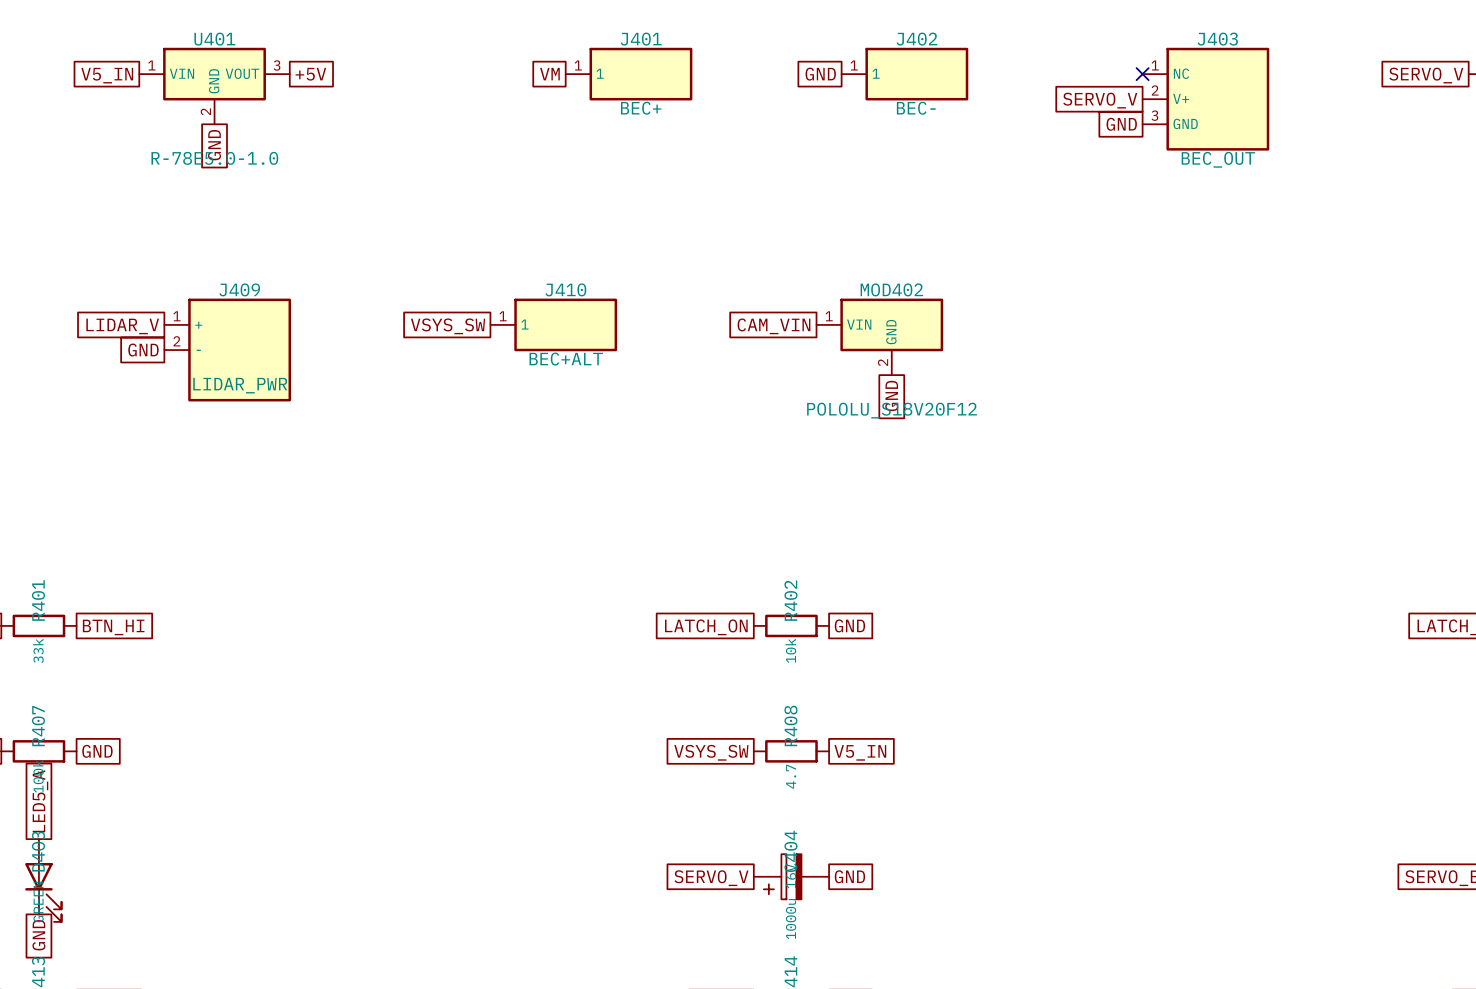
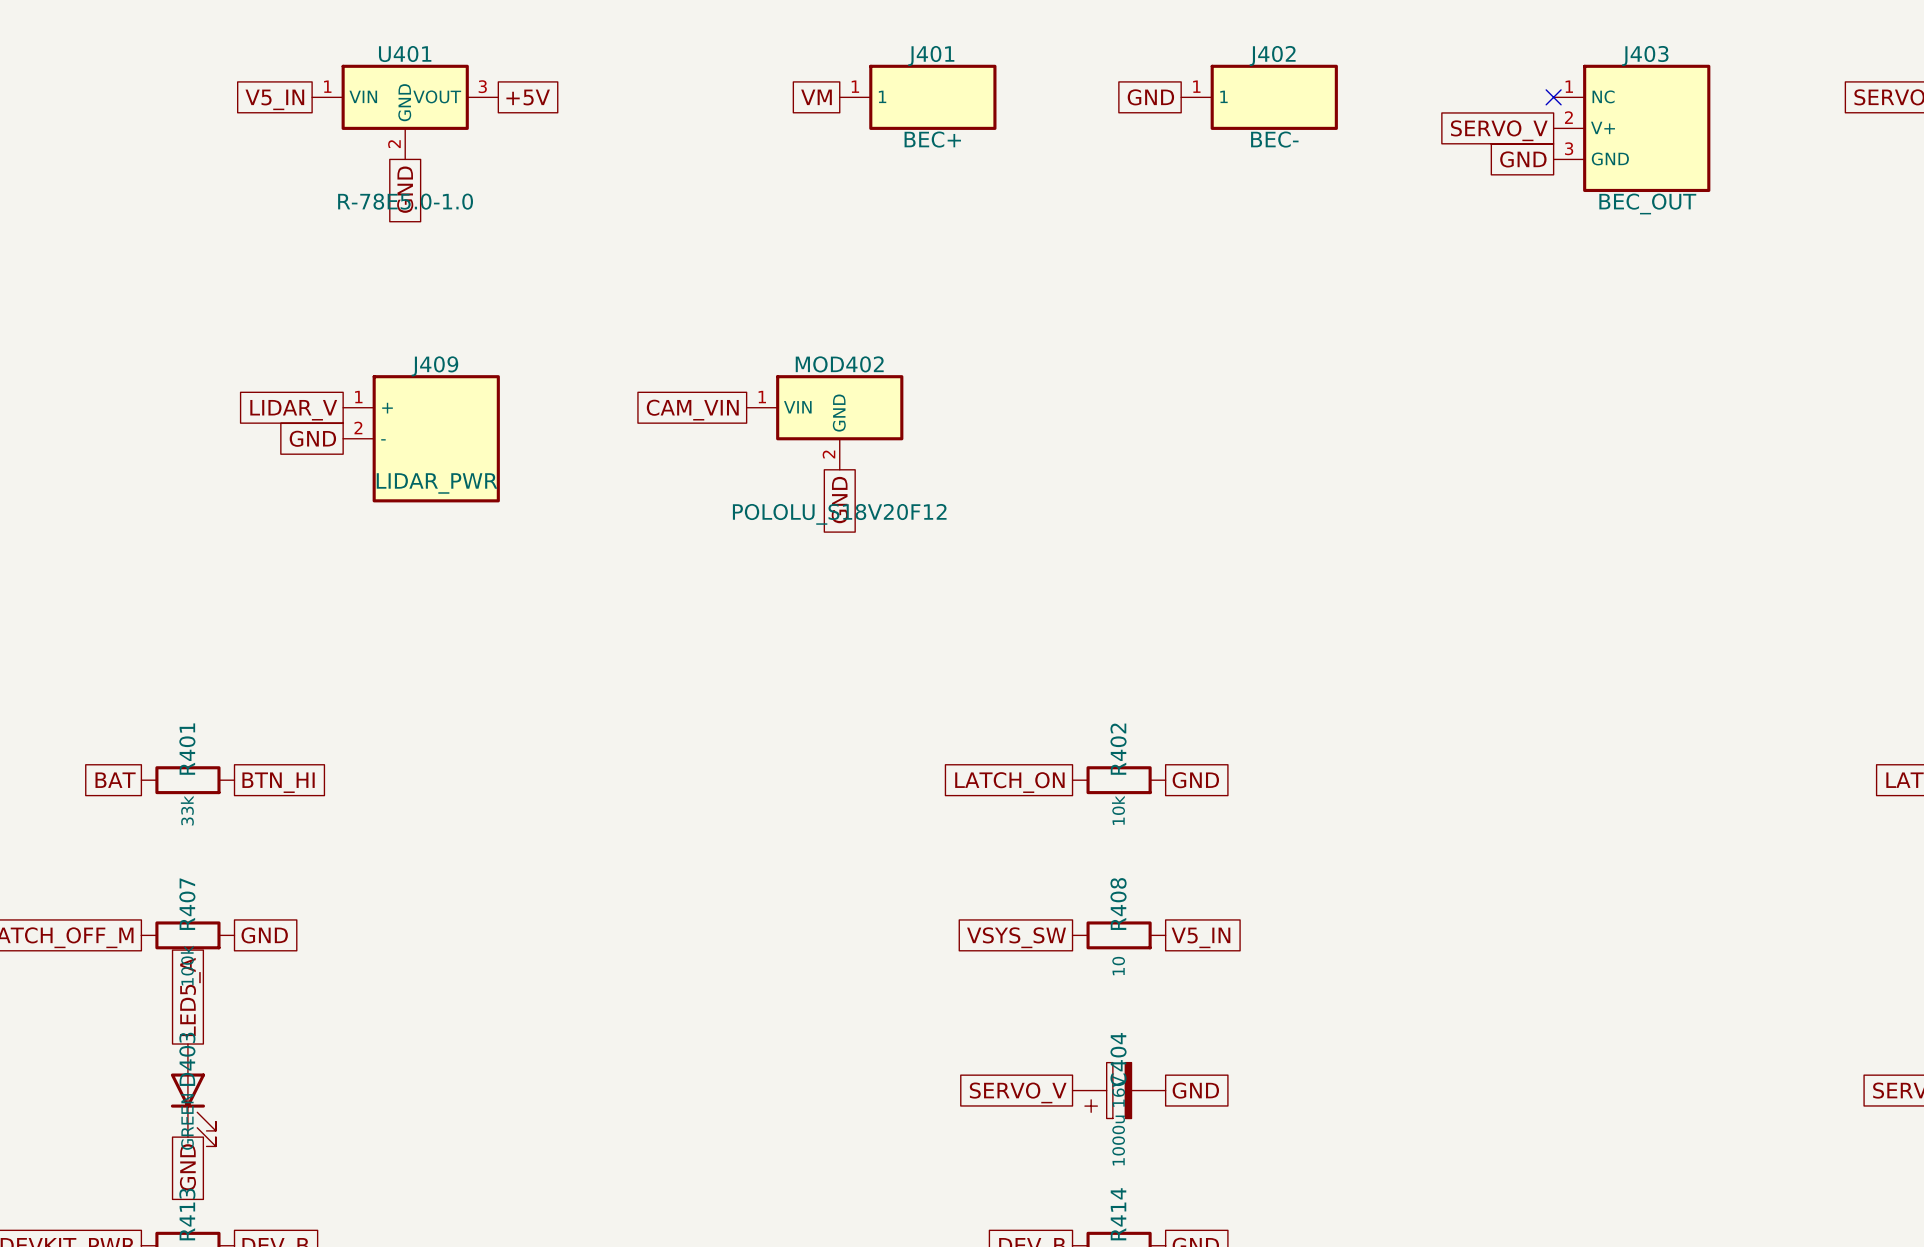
J410: BEC+ALT (553, 324) -> none
global label: VSYS_SW (448, 326) -> CAM_VIN (692, 410)
global label: CAM_VIN (773, 326) -> none
MOD402 position: (879, 336) -> (825, 422)
global label: none -> GND (839, 500)
global label: GND (891, 395) -> none
R408 value: 4.7 (791, 776) -> 10 (1118, 966)

